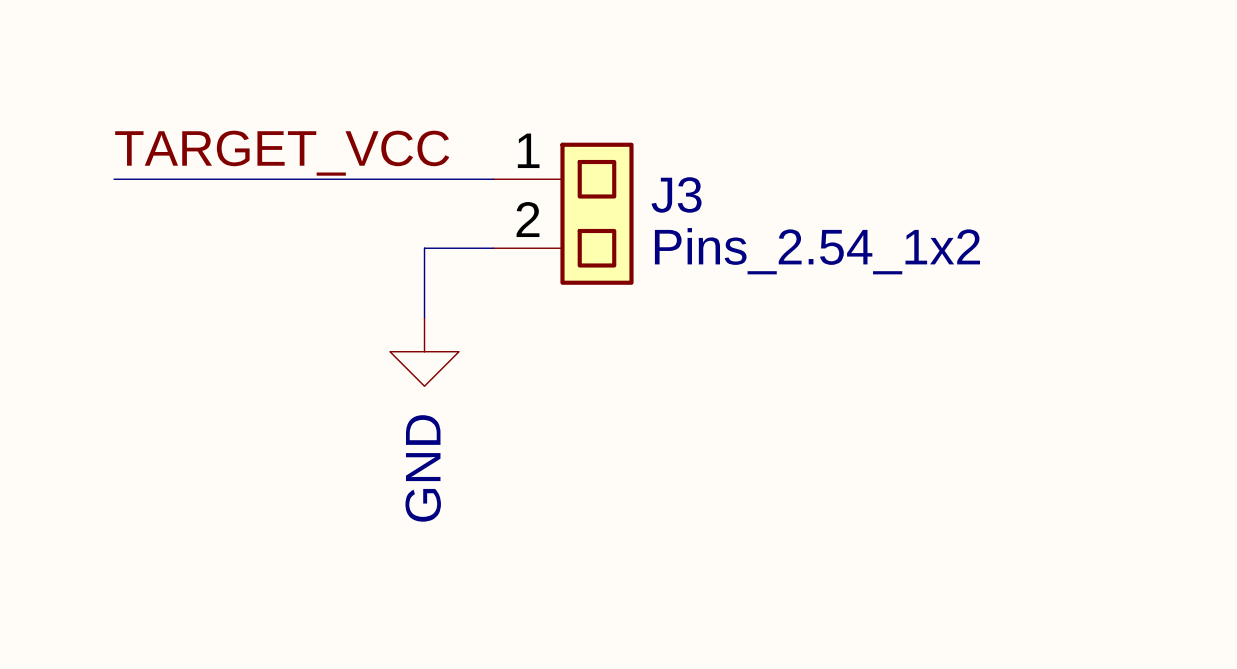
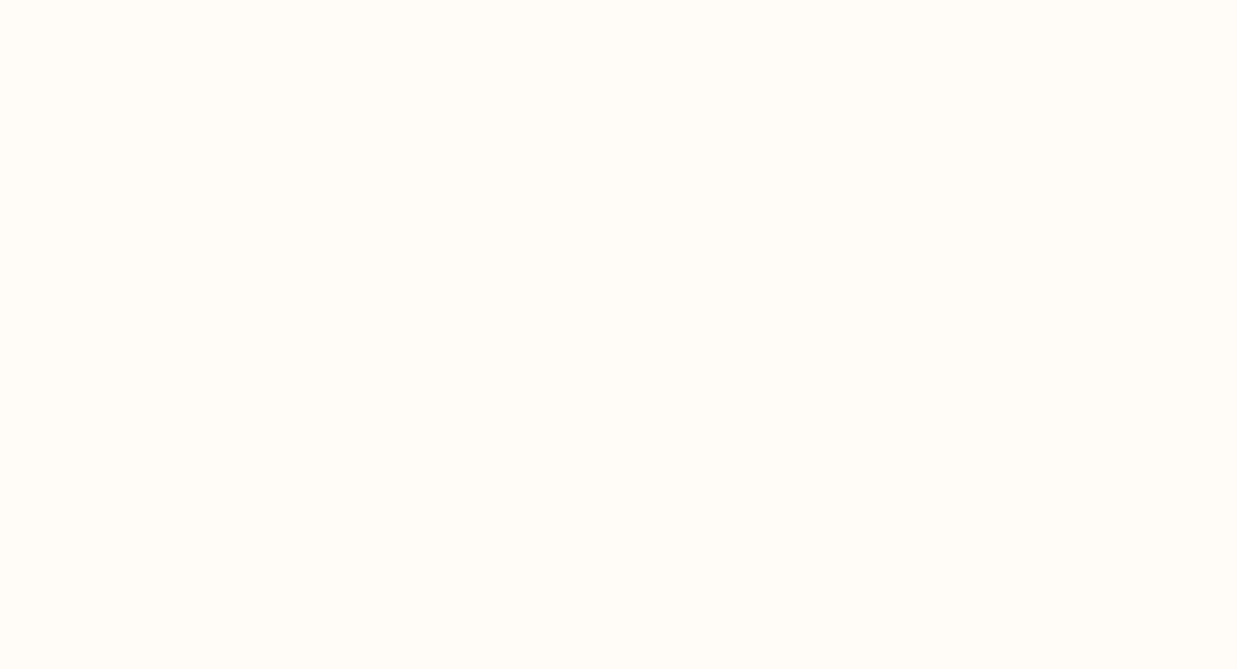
label: TARGET_VCC (282, 153) -> none
wire: (114, 179) (493, 179) -> none
J3: Pins_2.54_1x2 (563, 213) -> none
wire: (493, 248) (424, 248) (424, 317) -> none
power symbol: GND (424, 351) -> none

